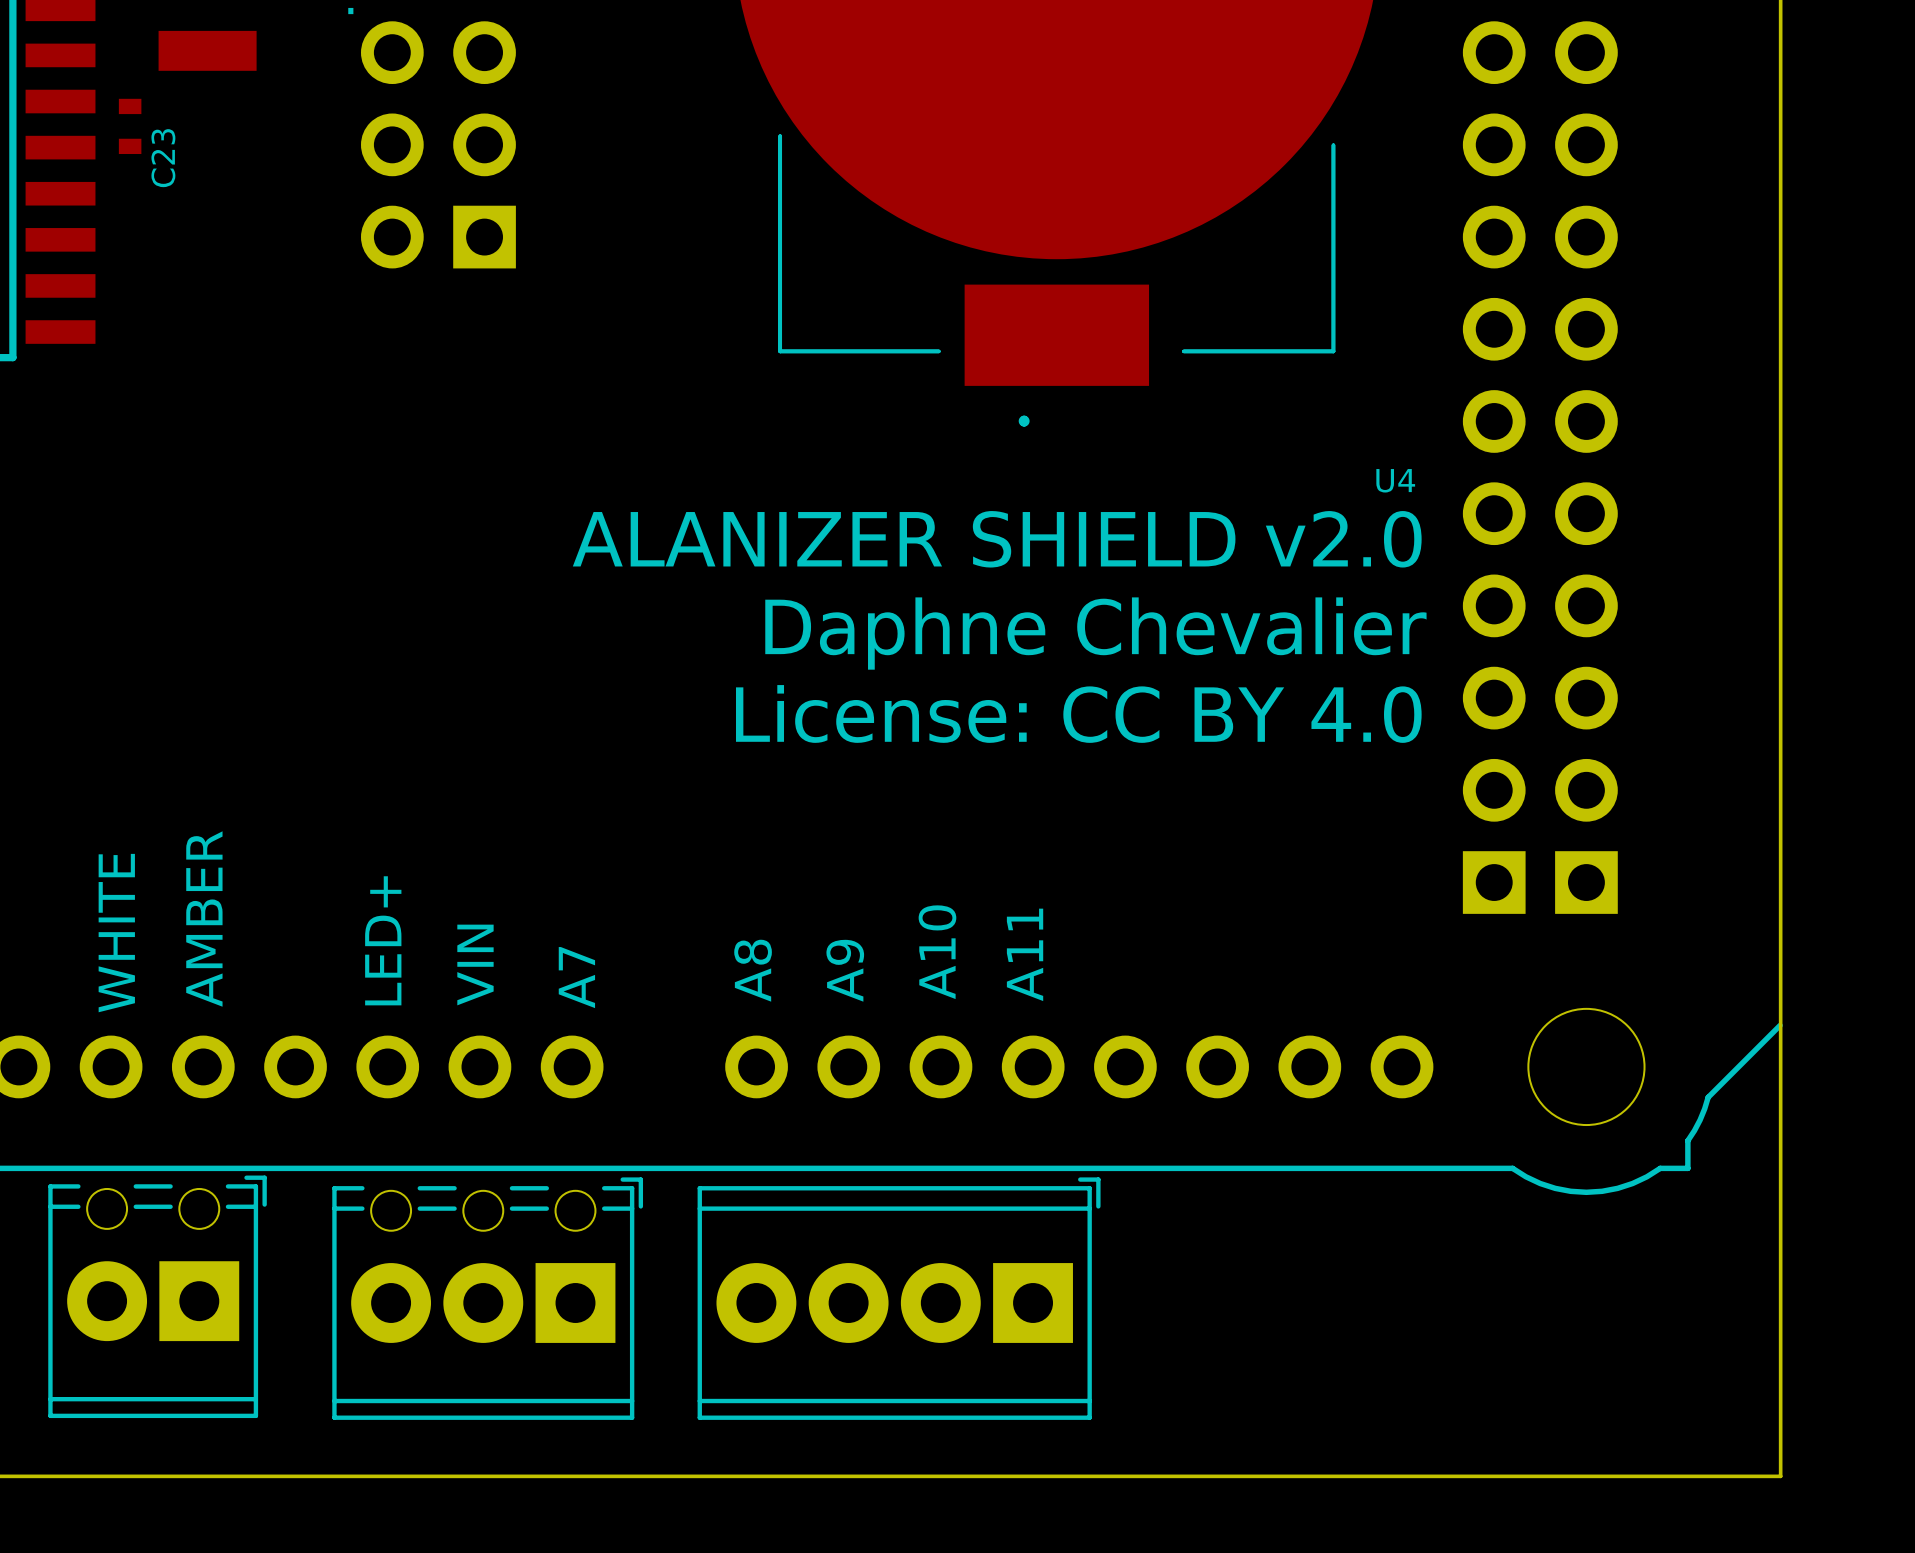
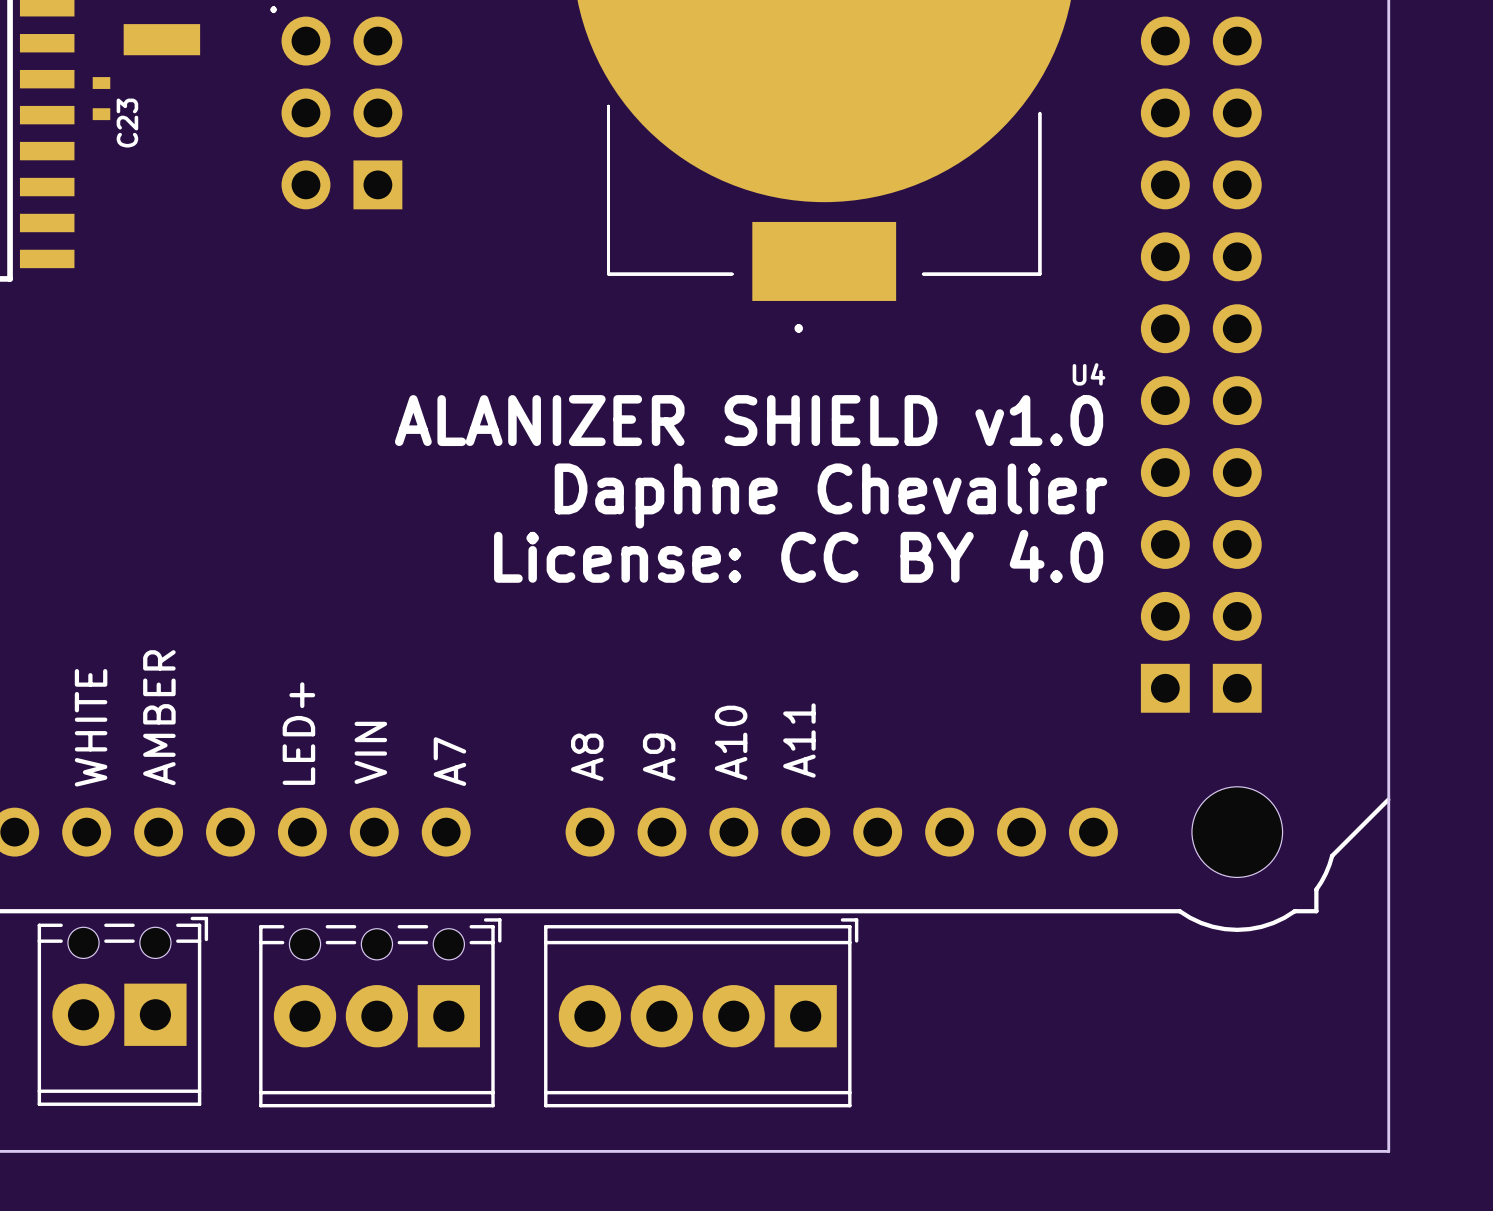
text: ALANIZER SHIELD v2.0 (997, 539) -> ALANIZER SHIELD v1.0 (749, 420)

